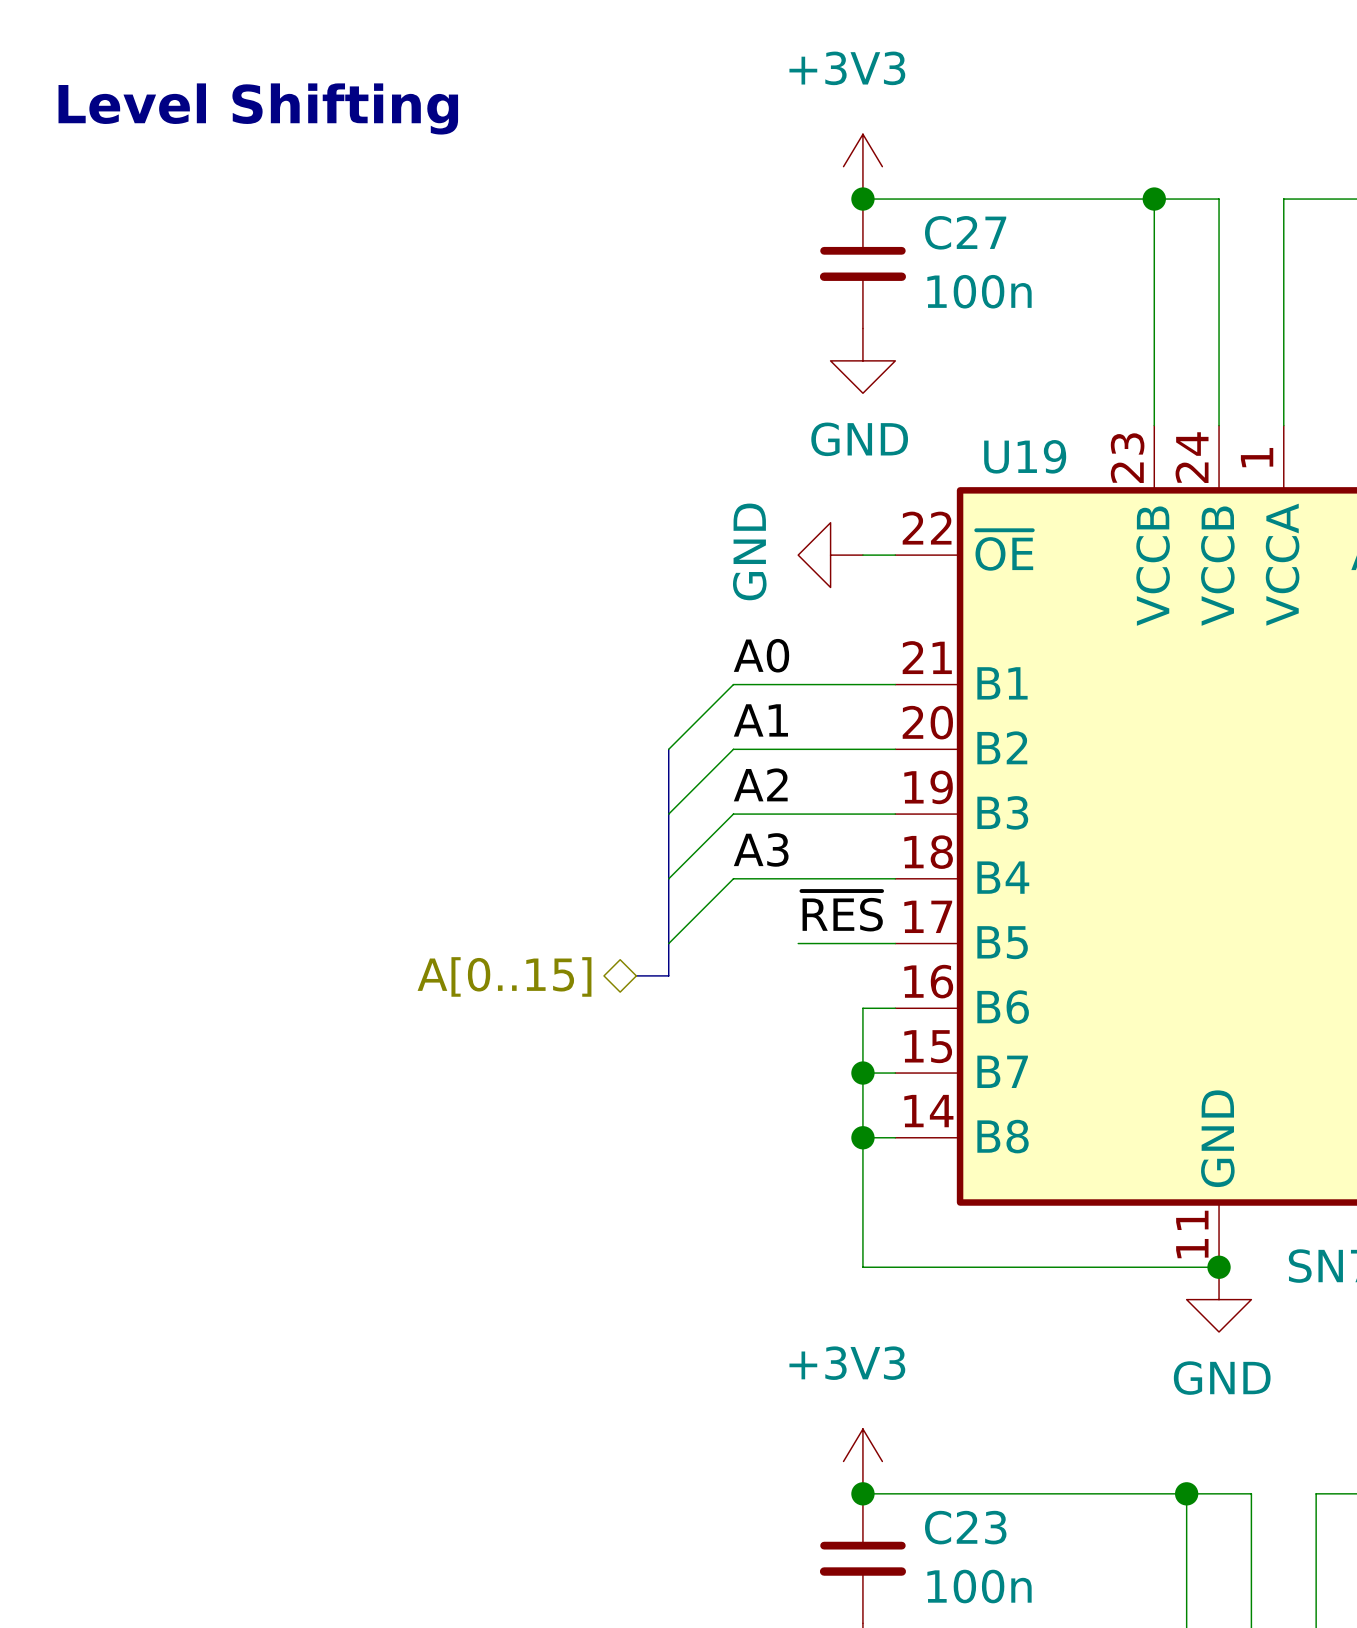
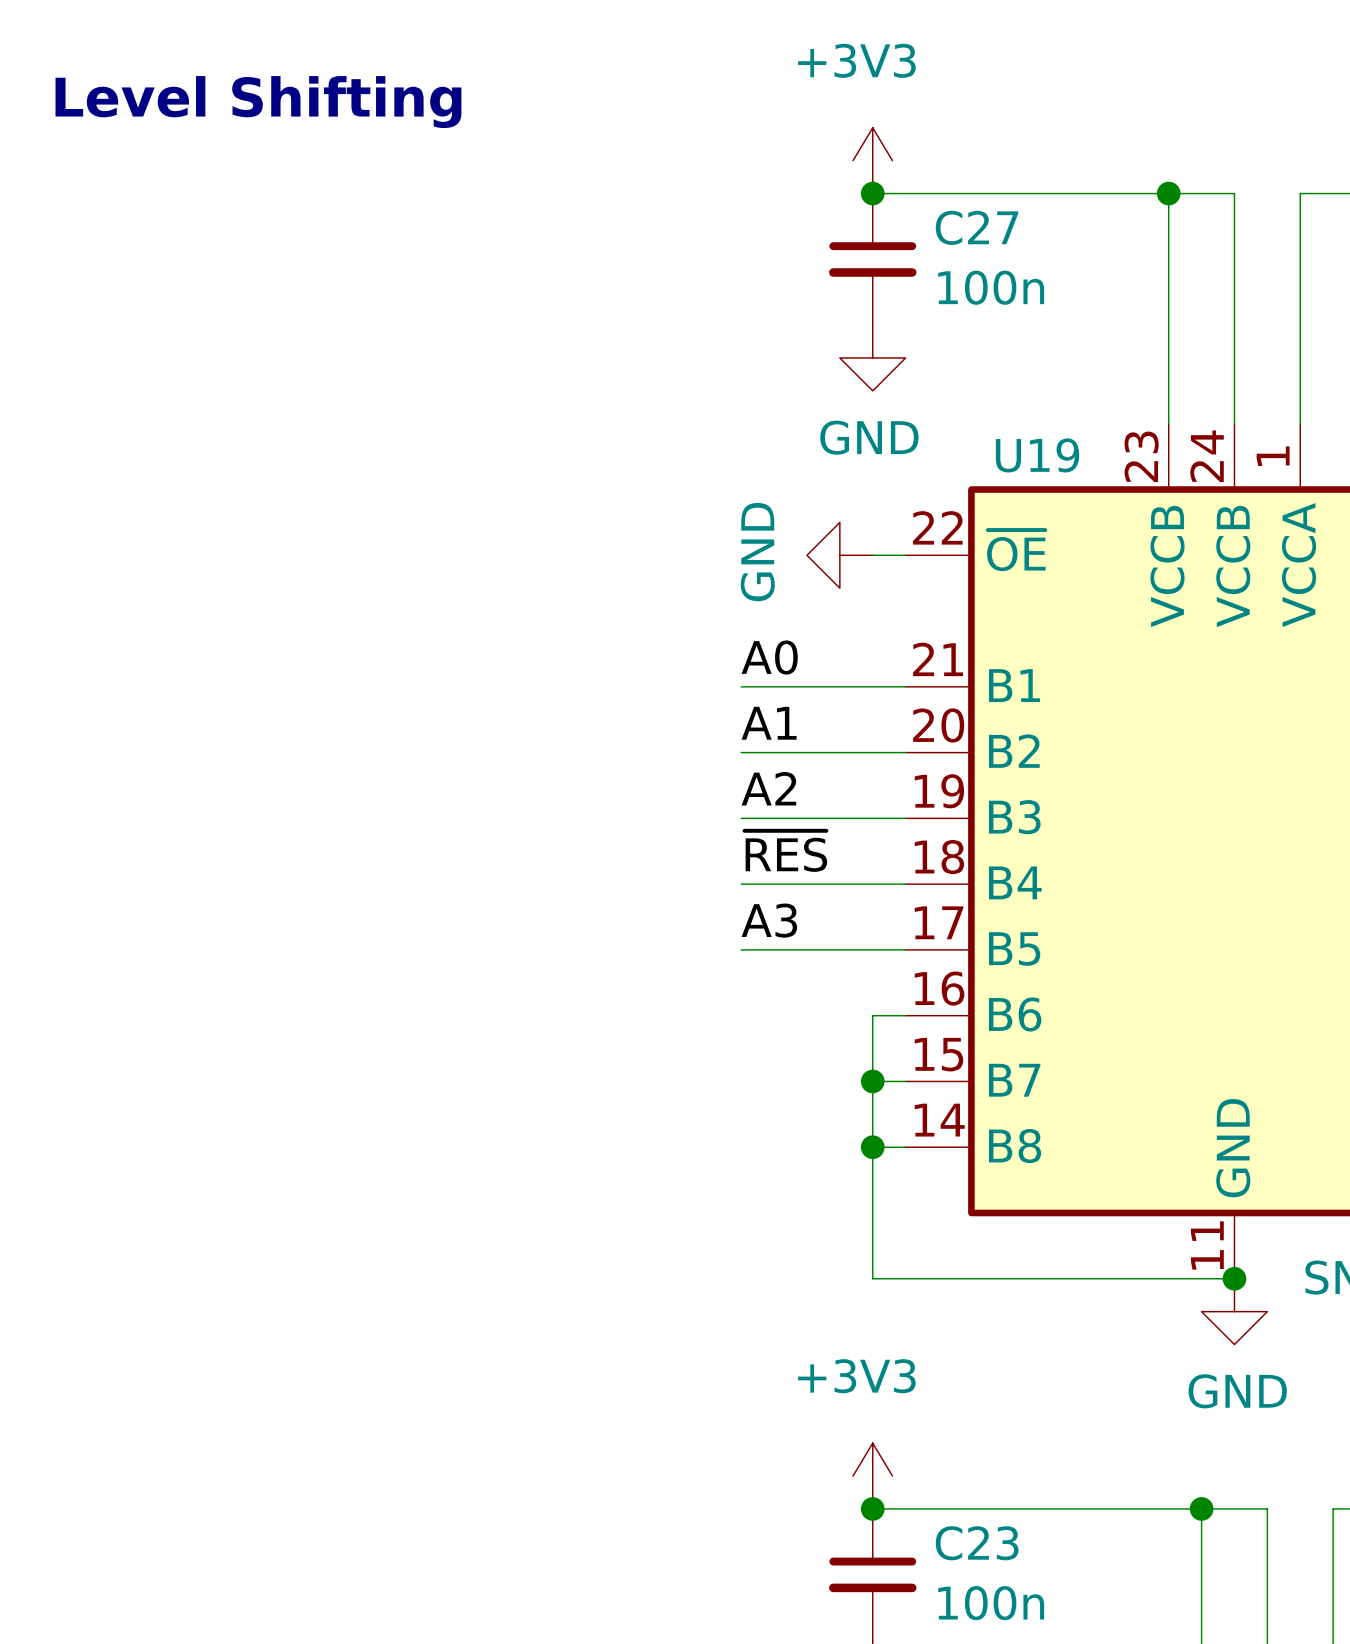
wire: (733, 684) (668, 749) -> none
bus: (668, 749) (668, 975) (636, 975) -> none
wire: (733, 749) (668, 814) -> none
wire: (733, 814) (668, 878) -> none
label: A3 (761, 849) -> ~{RES} (785, 851)
wire: (733, 878) (668, 943) -> none
label: ~{RES} (842, 911) -> none
label: none -> A3 (769, 920)
wire: none -> (741, 949) (806, 949)
hierarchical label: A[0..15] (504, 976) -> none

